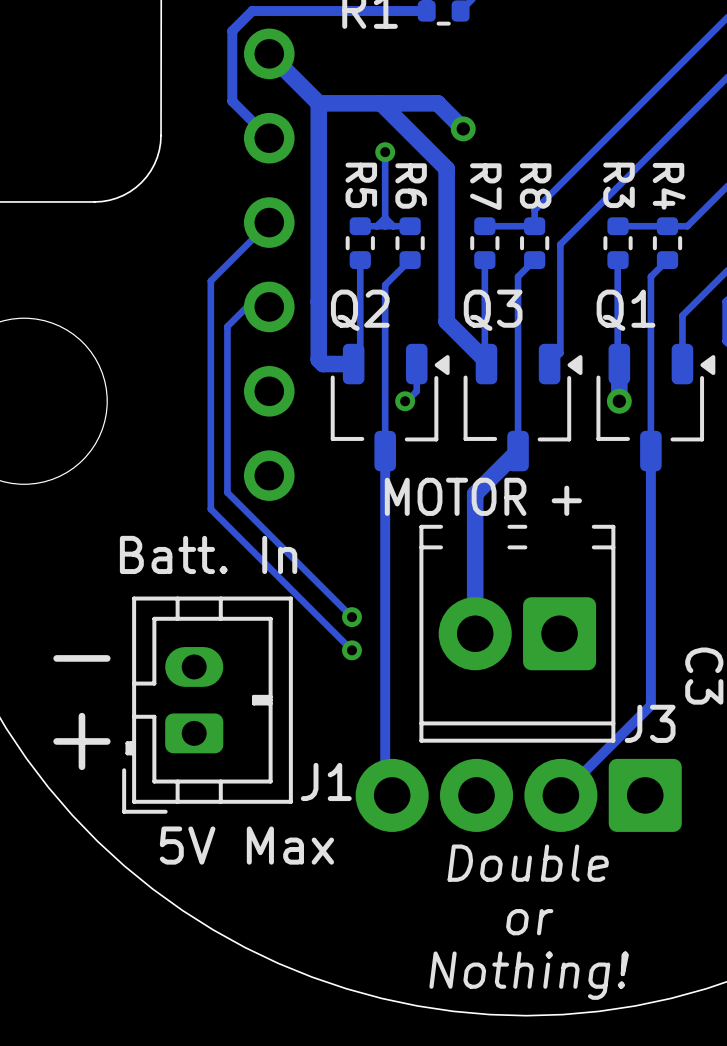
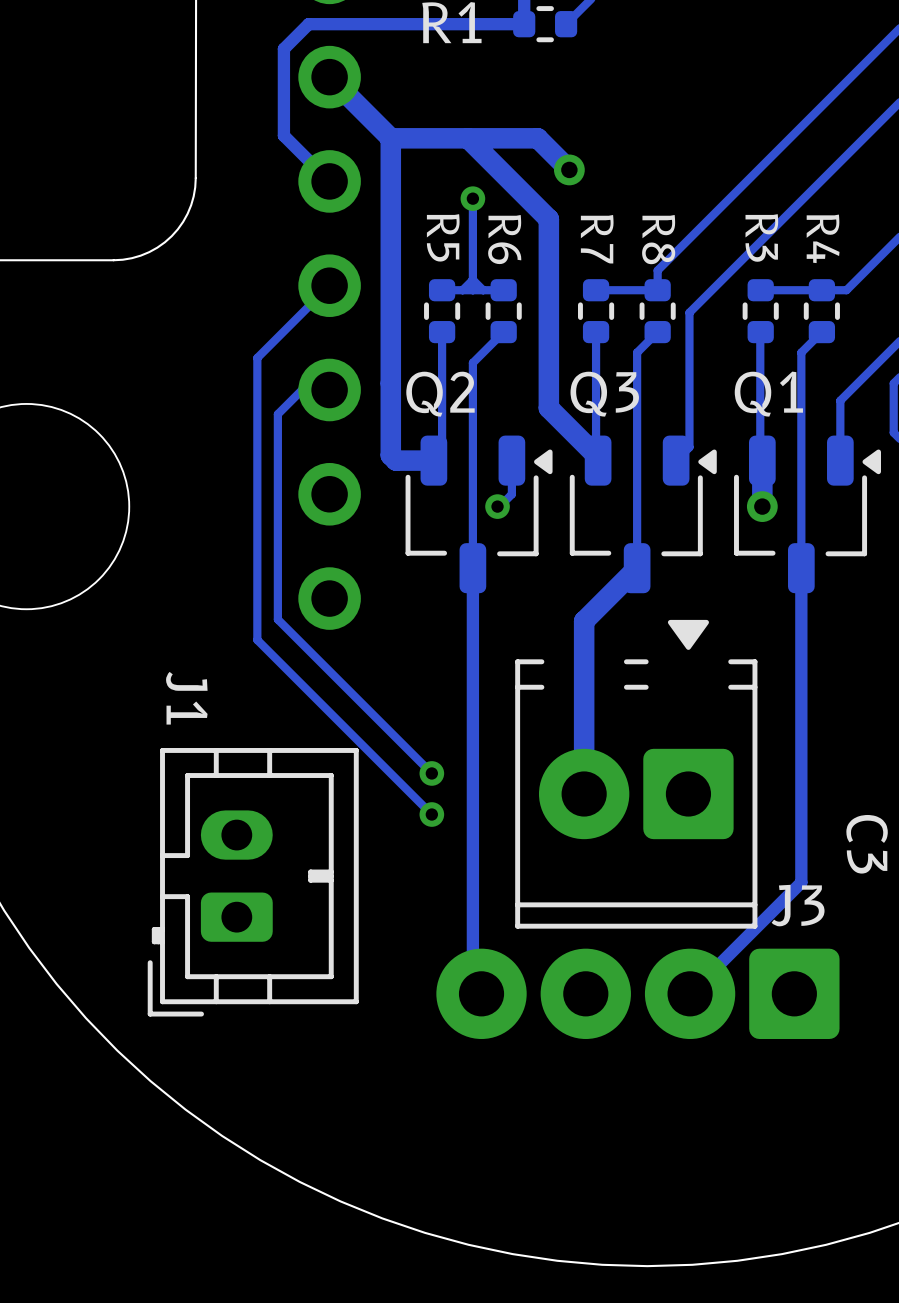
text: MOTOR (455, 496) -> none
text: + (566, 500) -> none
J3 footprint: [419, 524, 616, 743] -> [515, 619, 758, 929]
text: Batt. In (208, 554) -> none
text: - (81, 658) -> none
text: + (81, 741) -> none
J1 name rotation: 0° (326, 781) -> 90° clockwise (186, 698)
J1 name position: J1 (326, 781) -> J1 (186, 698)
text: 5V Max (246, 845) -> none
text: Double (528, 863) -> none
text: or (529, 922) -> none
text: Nothing! (529, 975) -> none

